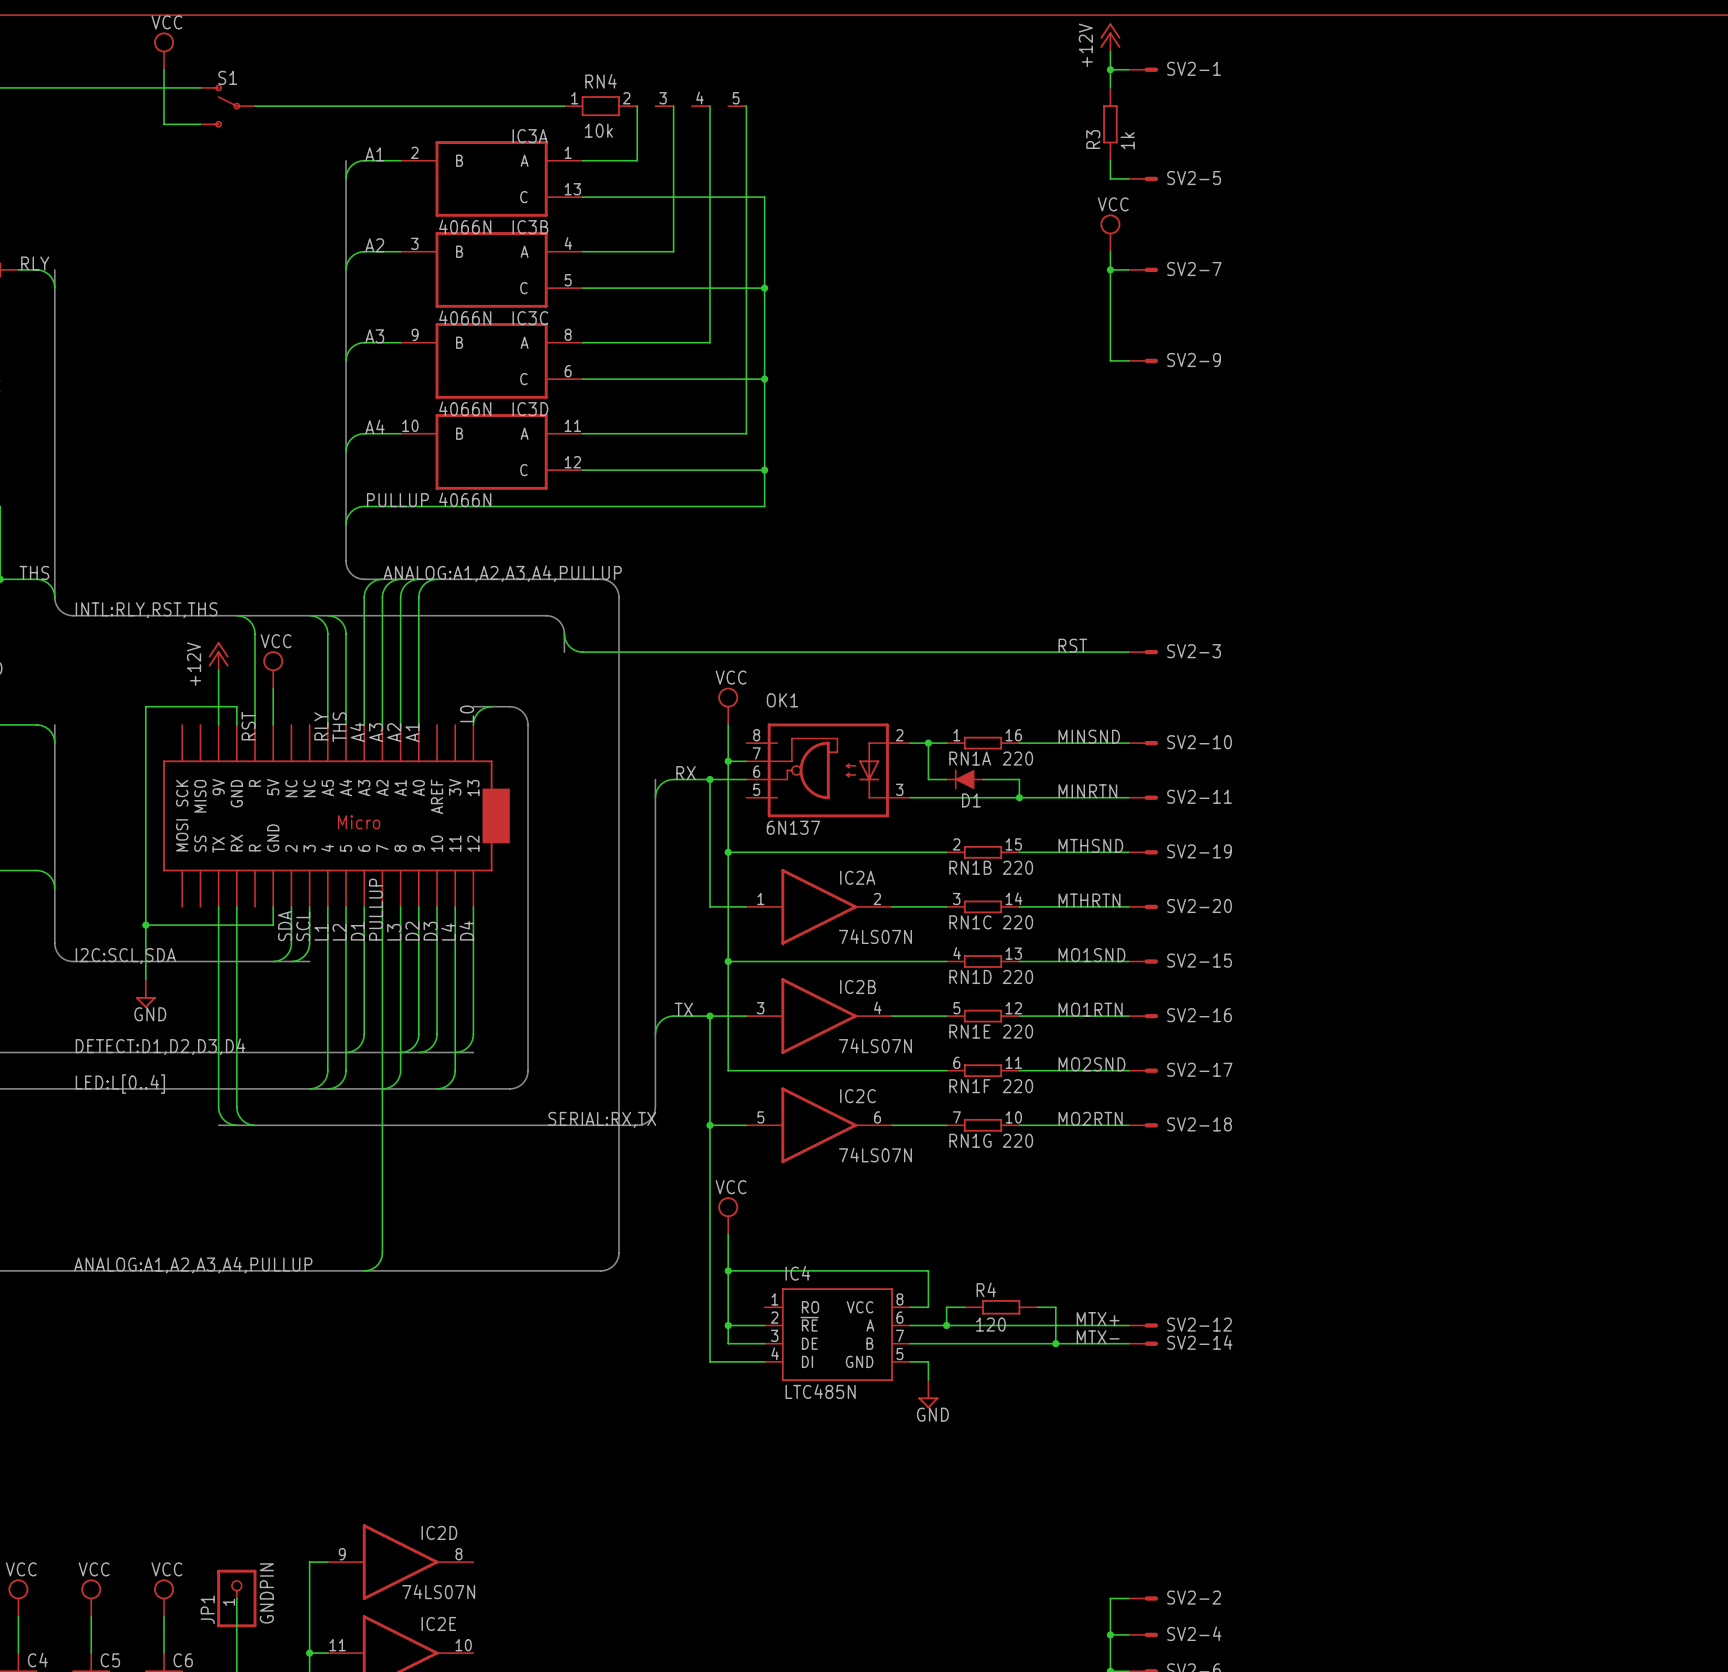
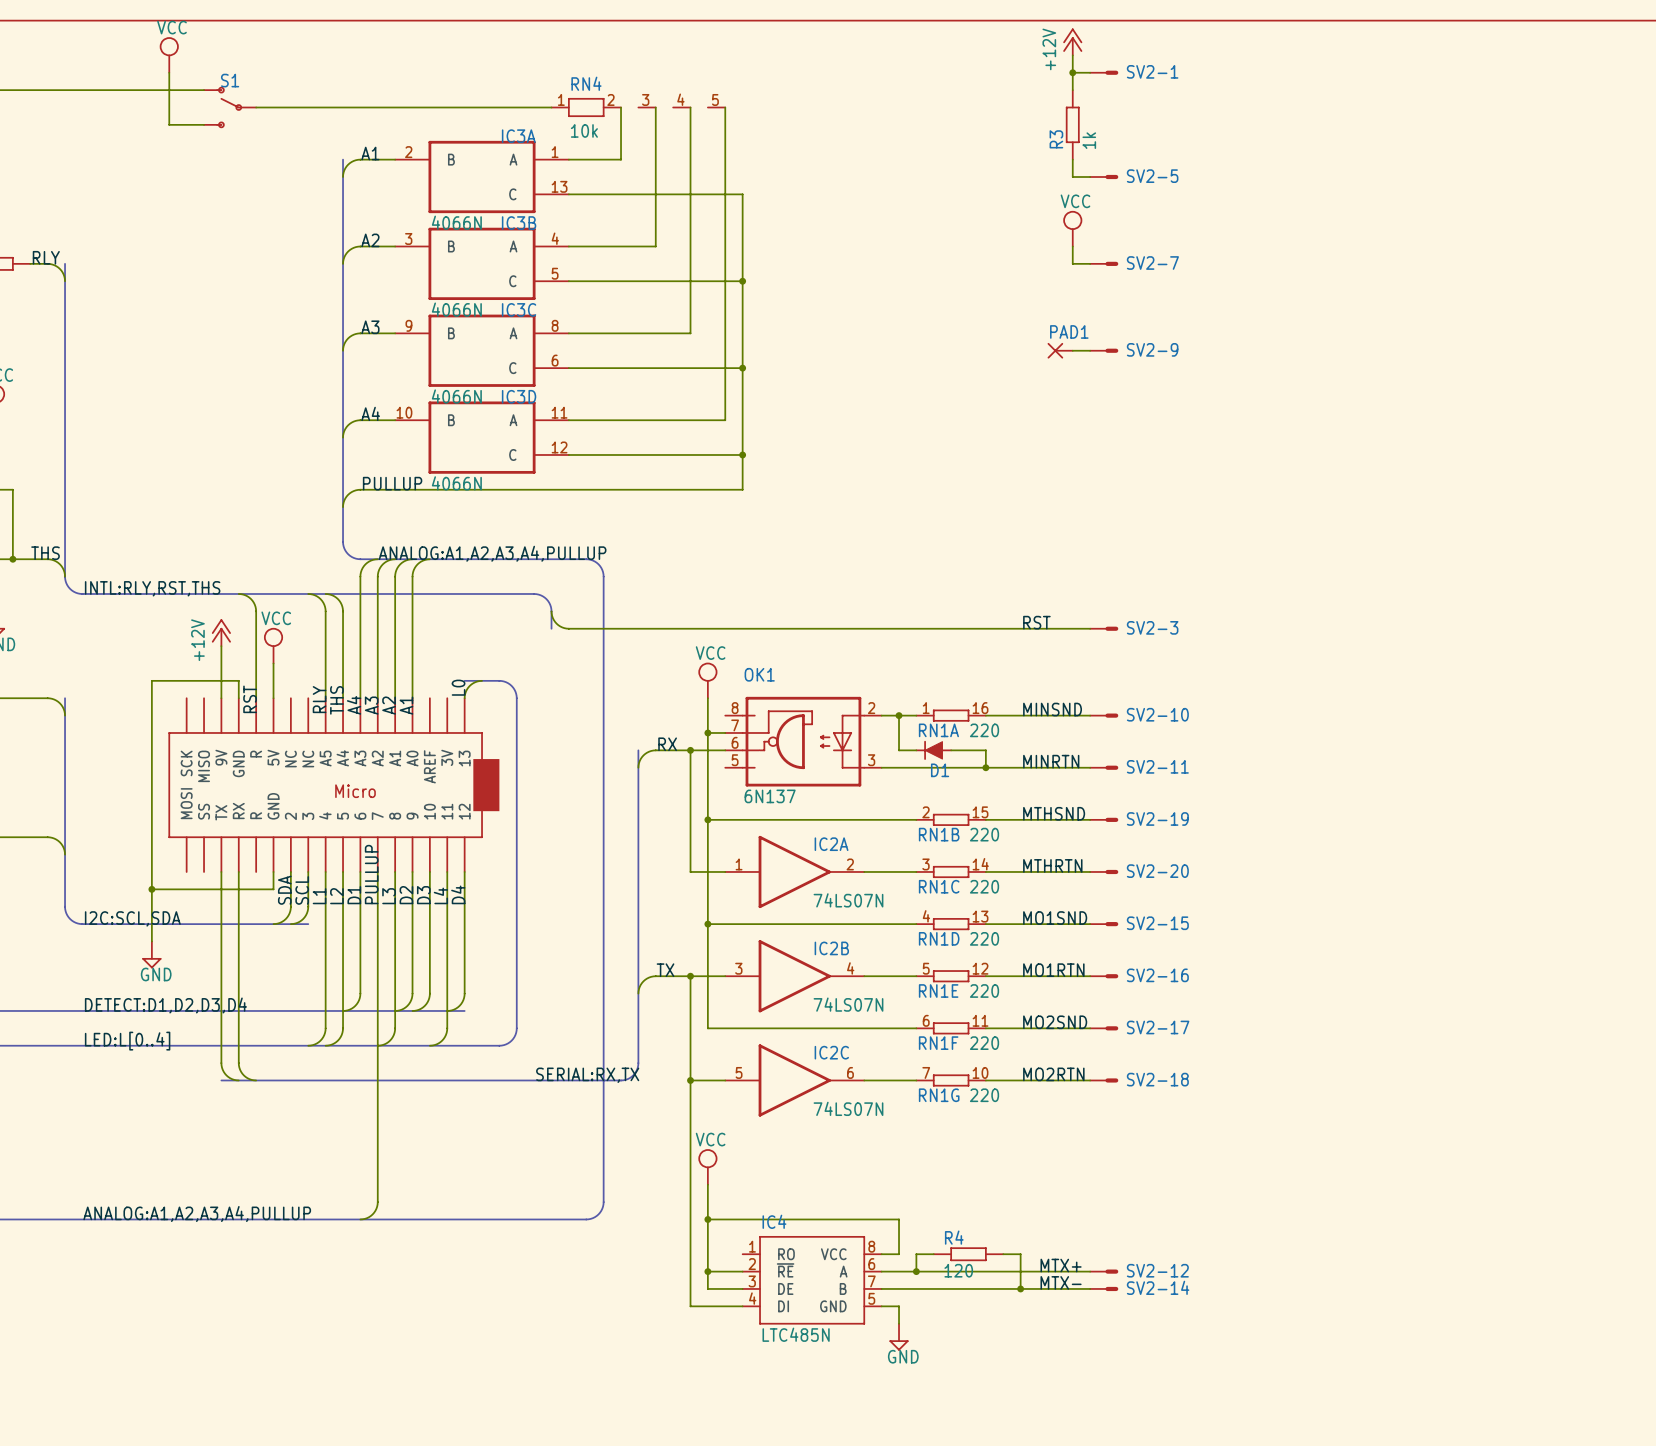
wire: (1110, 269) (1110, 360) -> none
junction: (1110, 269) -> none
PAD1: none -> (1060, 350)

